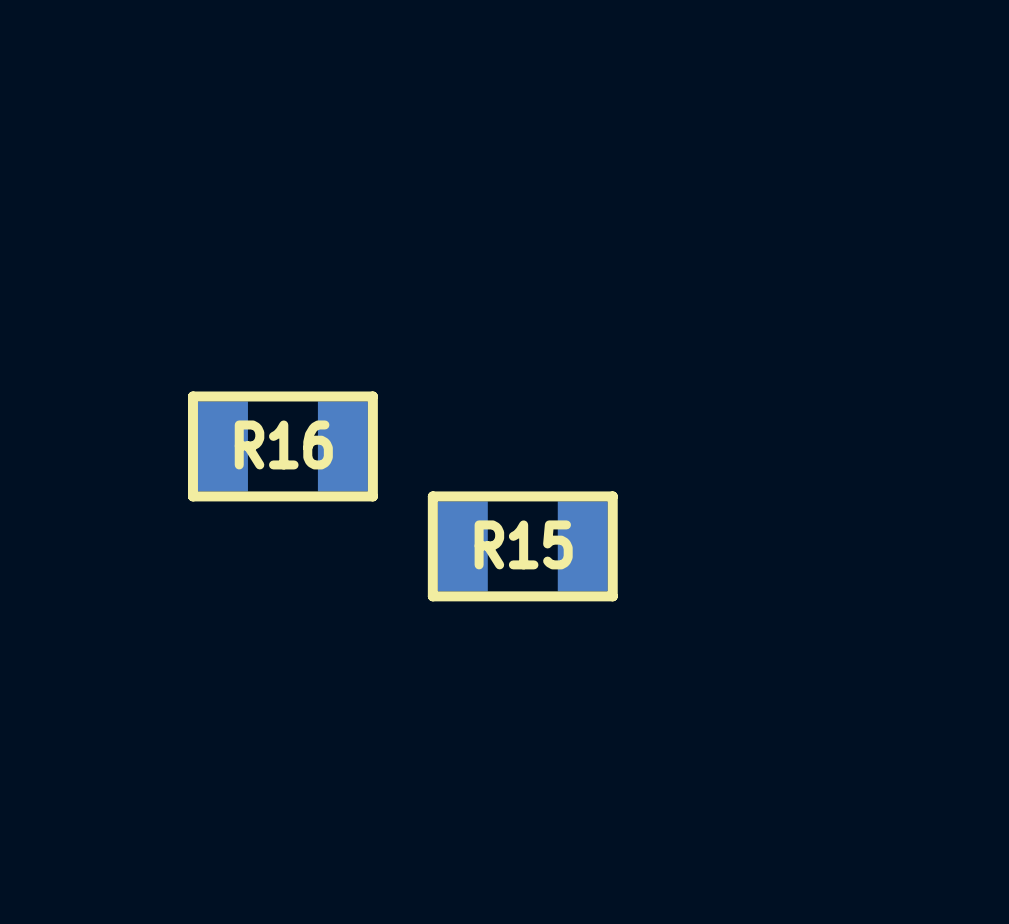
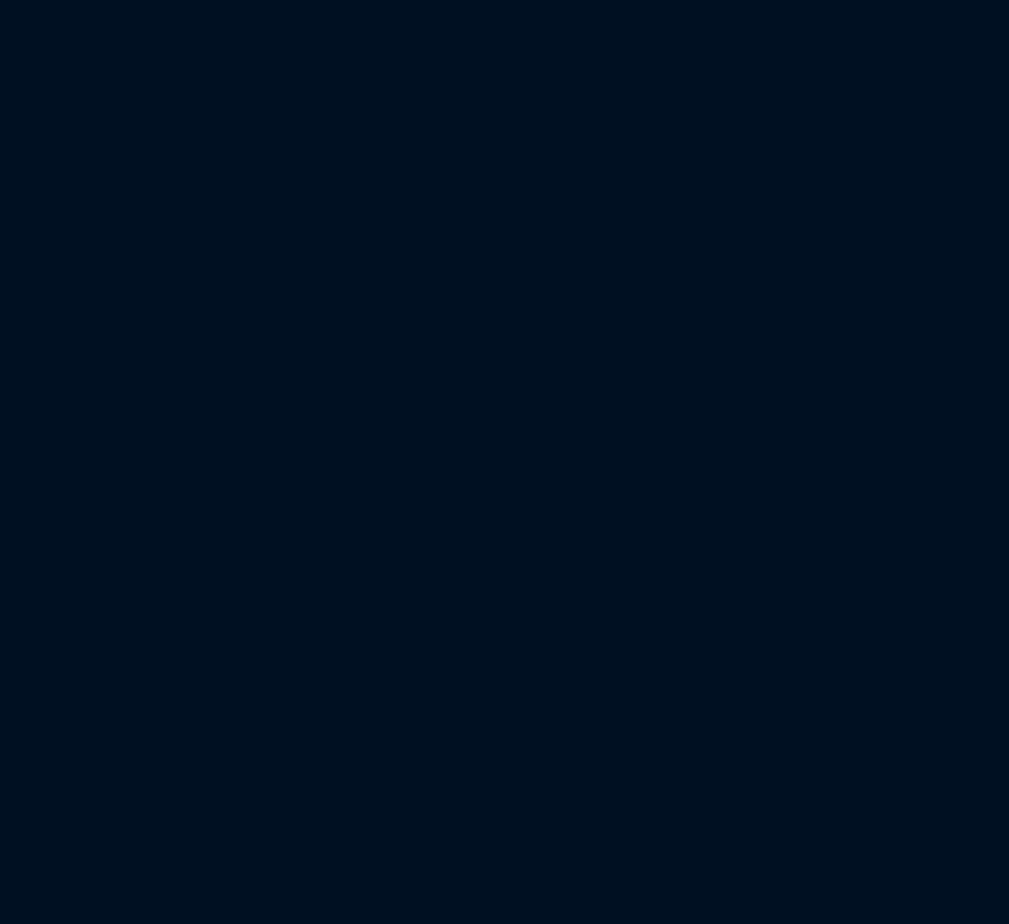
R16: (282, 446) -> none
R15: (522, 546) -> none

